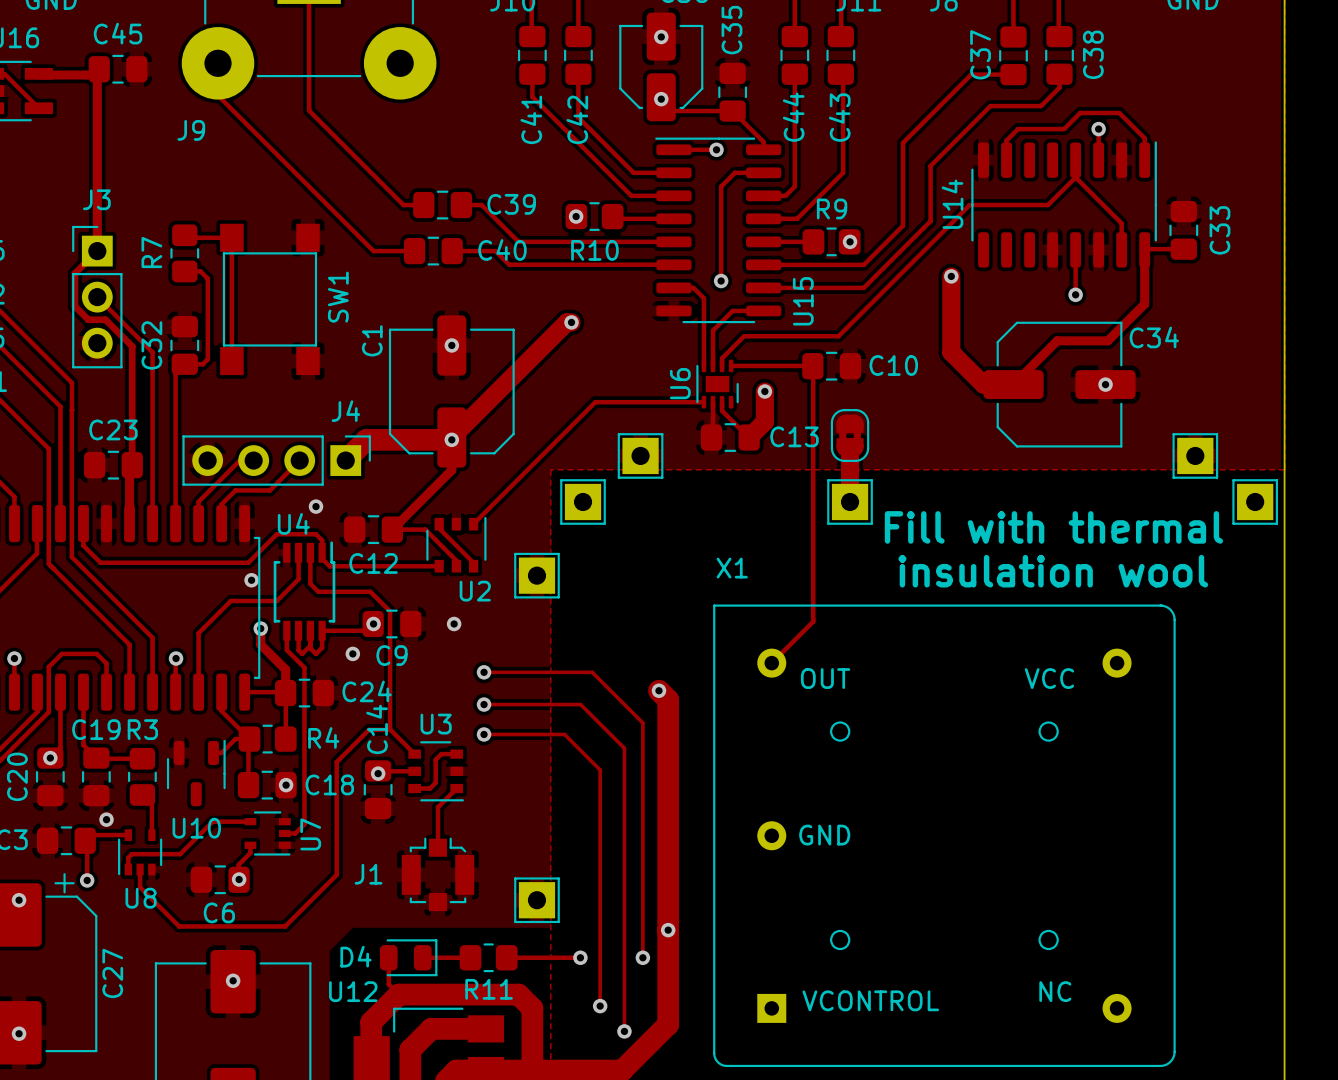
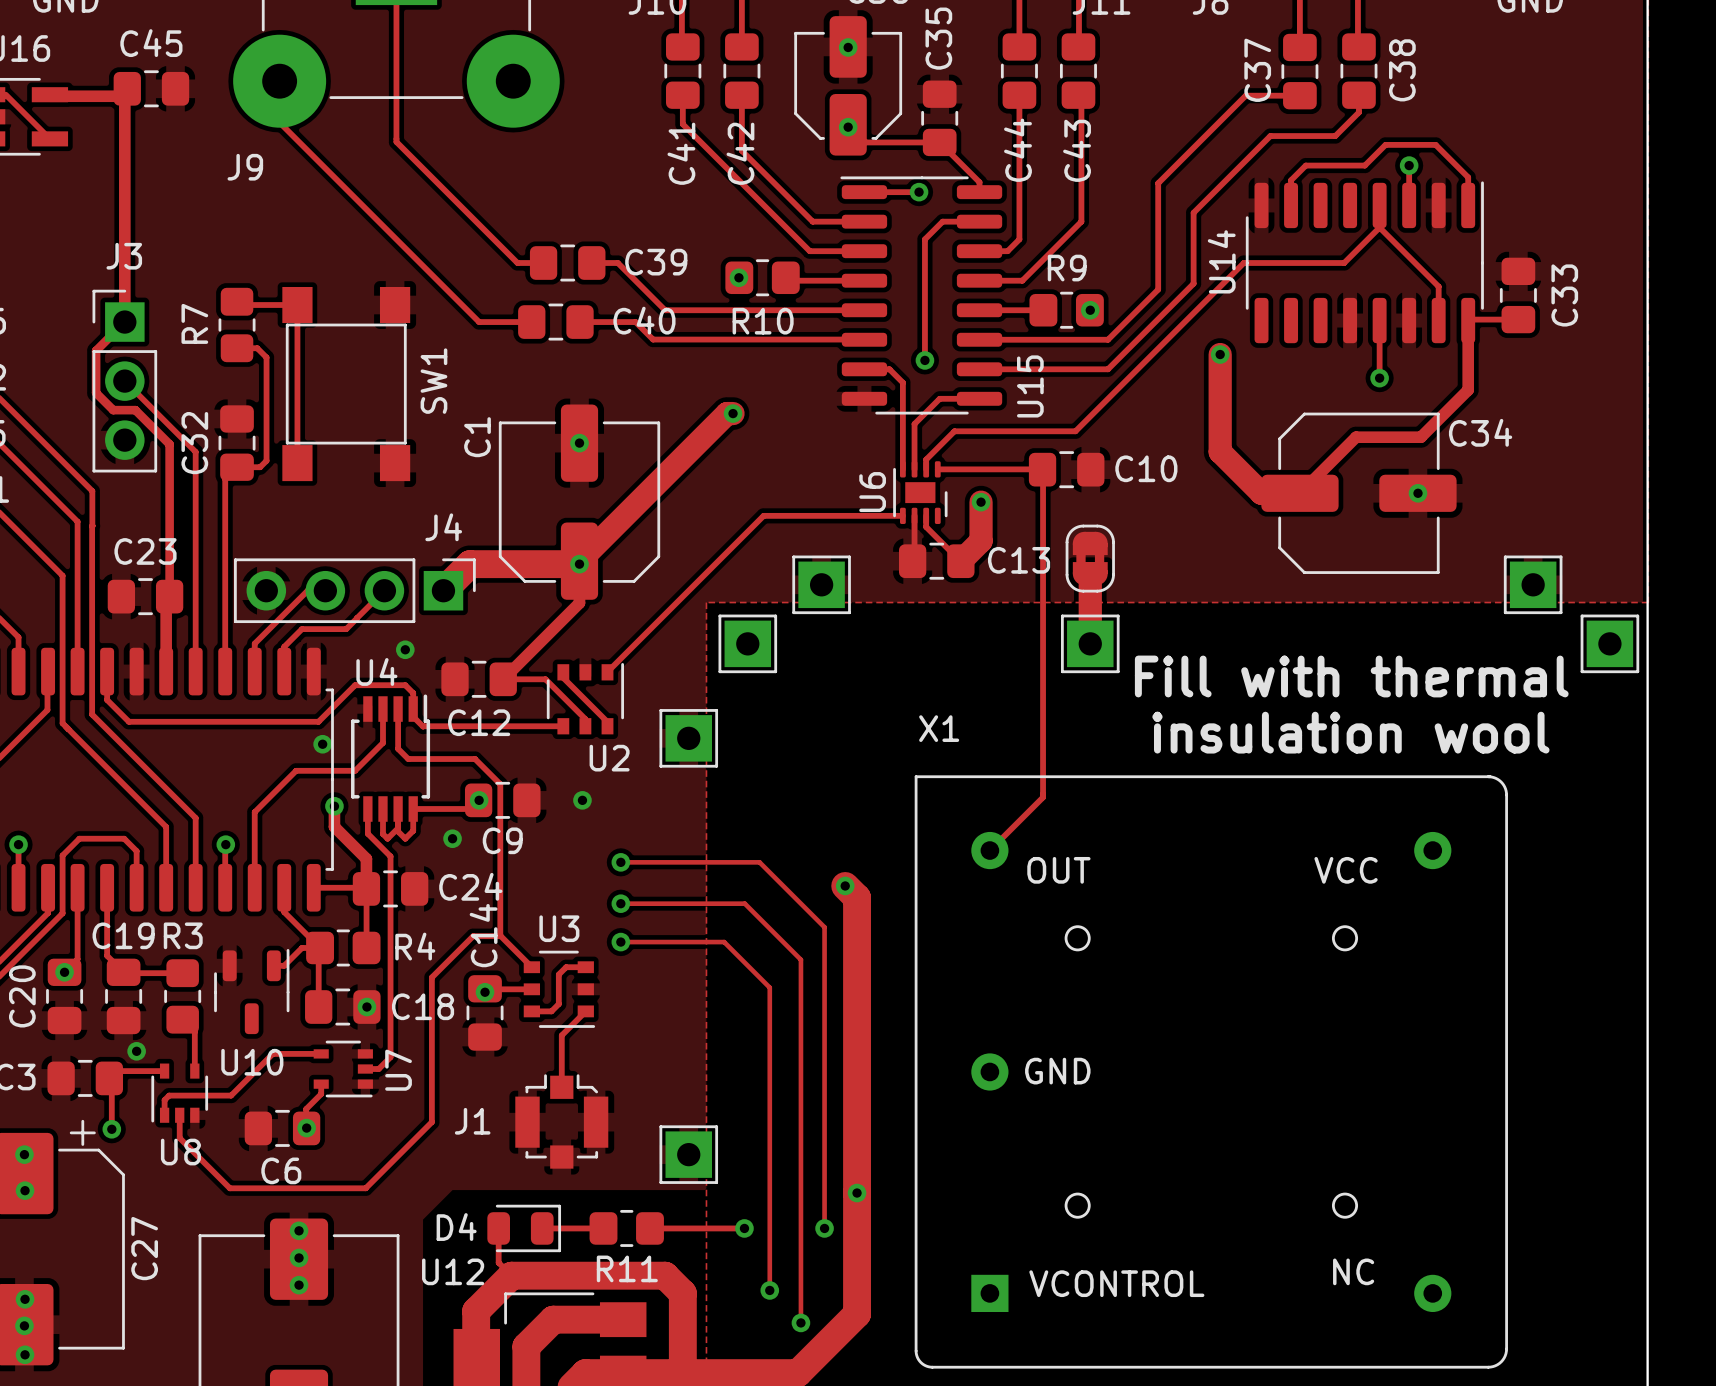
via: none -> (25, 1190)
via: none -> (299, 1230)
via: none -> (299, 1285)
via: none -> (25, 1299)
via: none -> (25, 1354)

